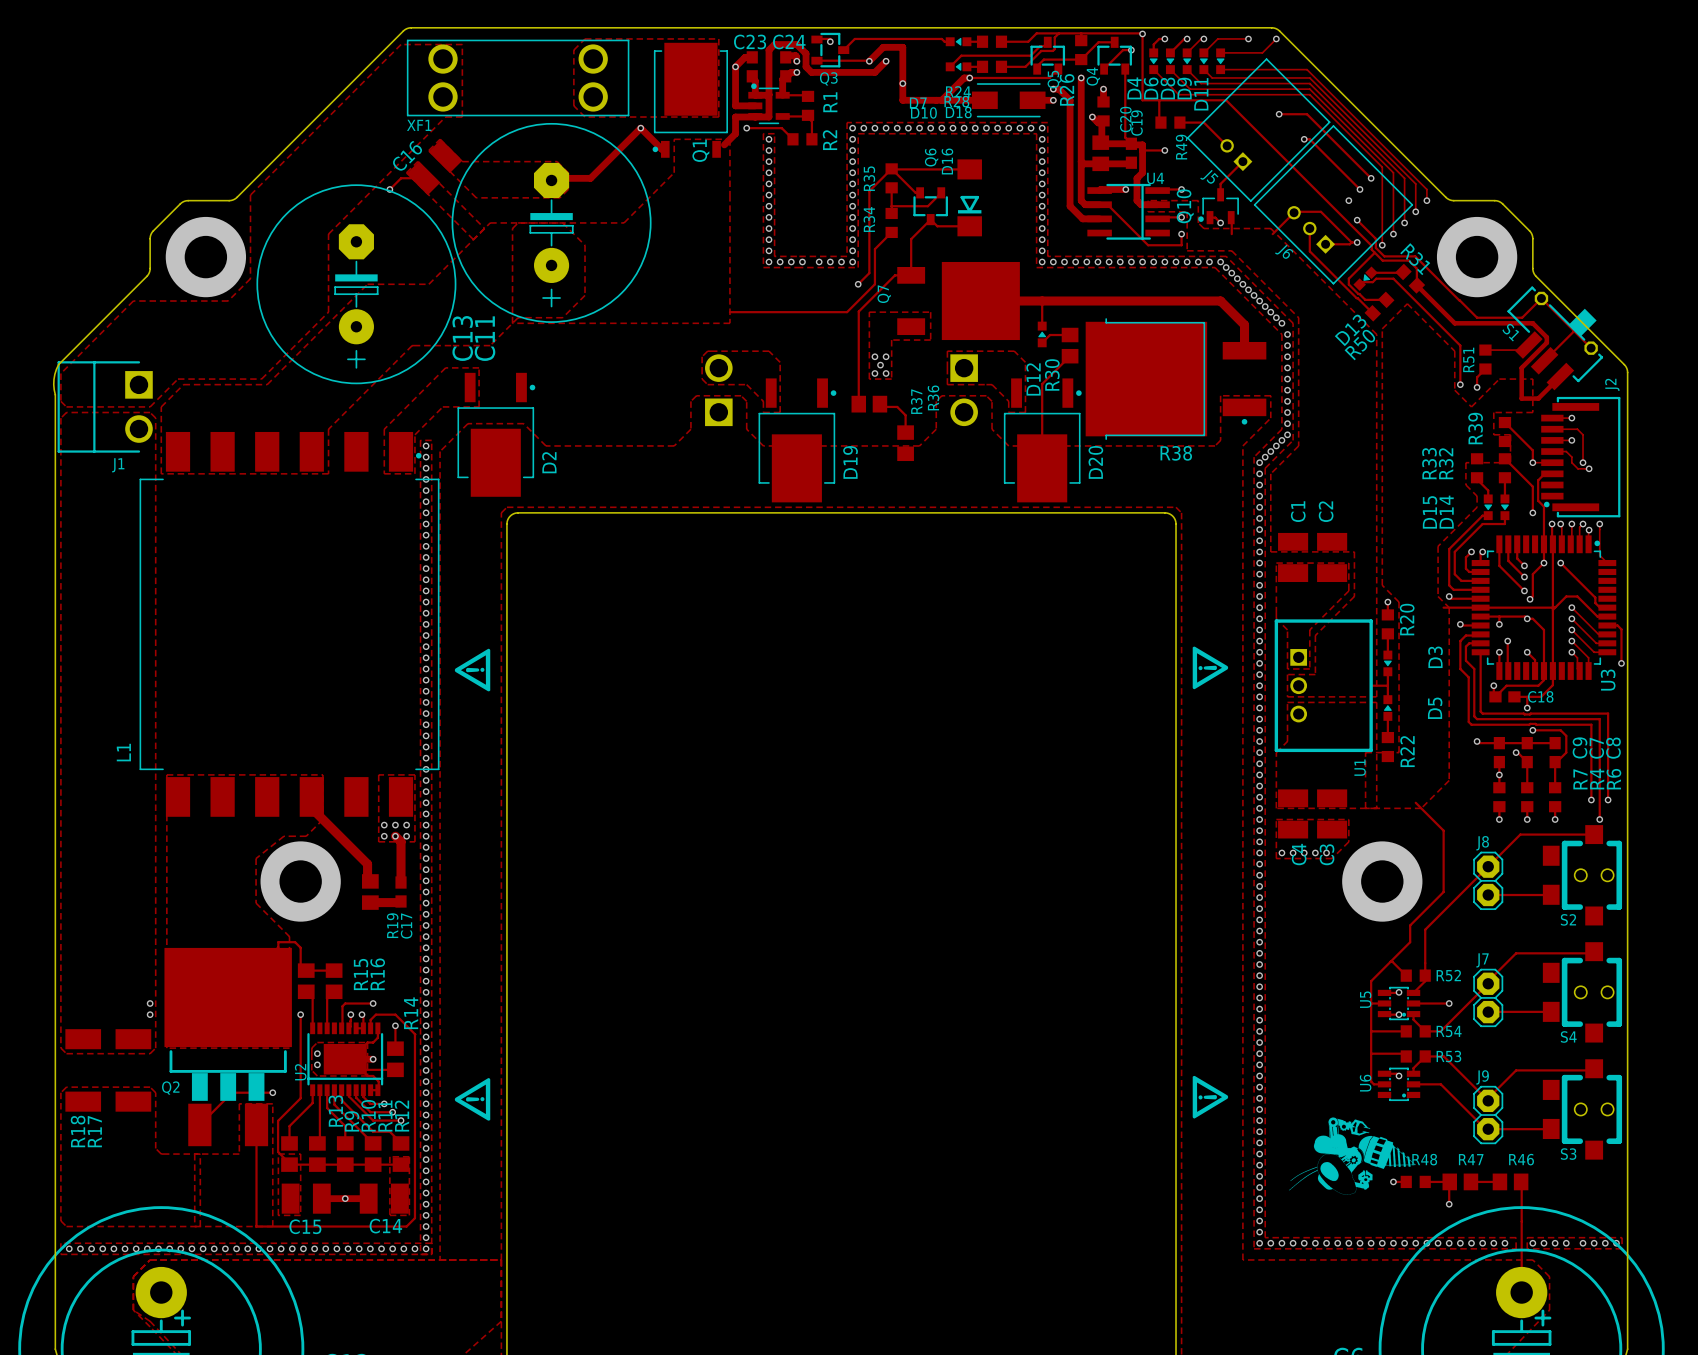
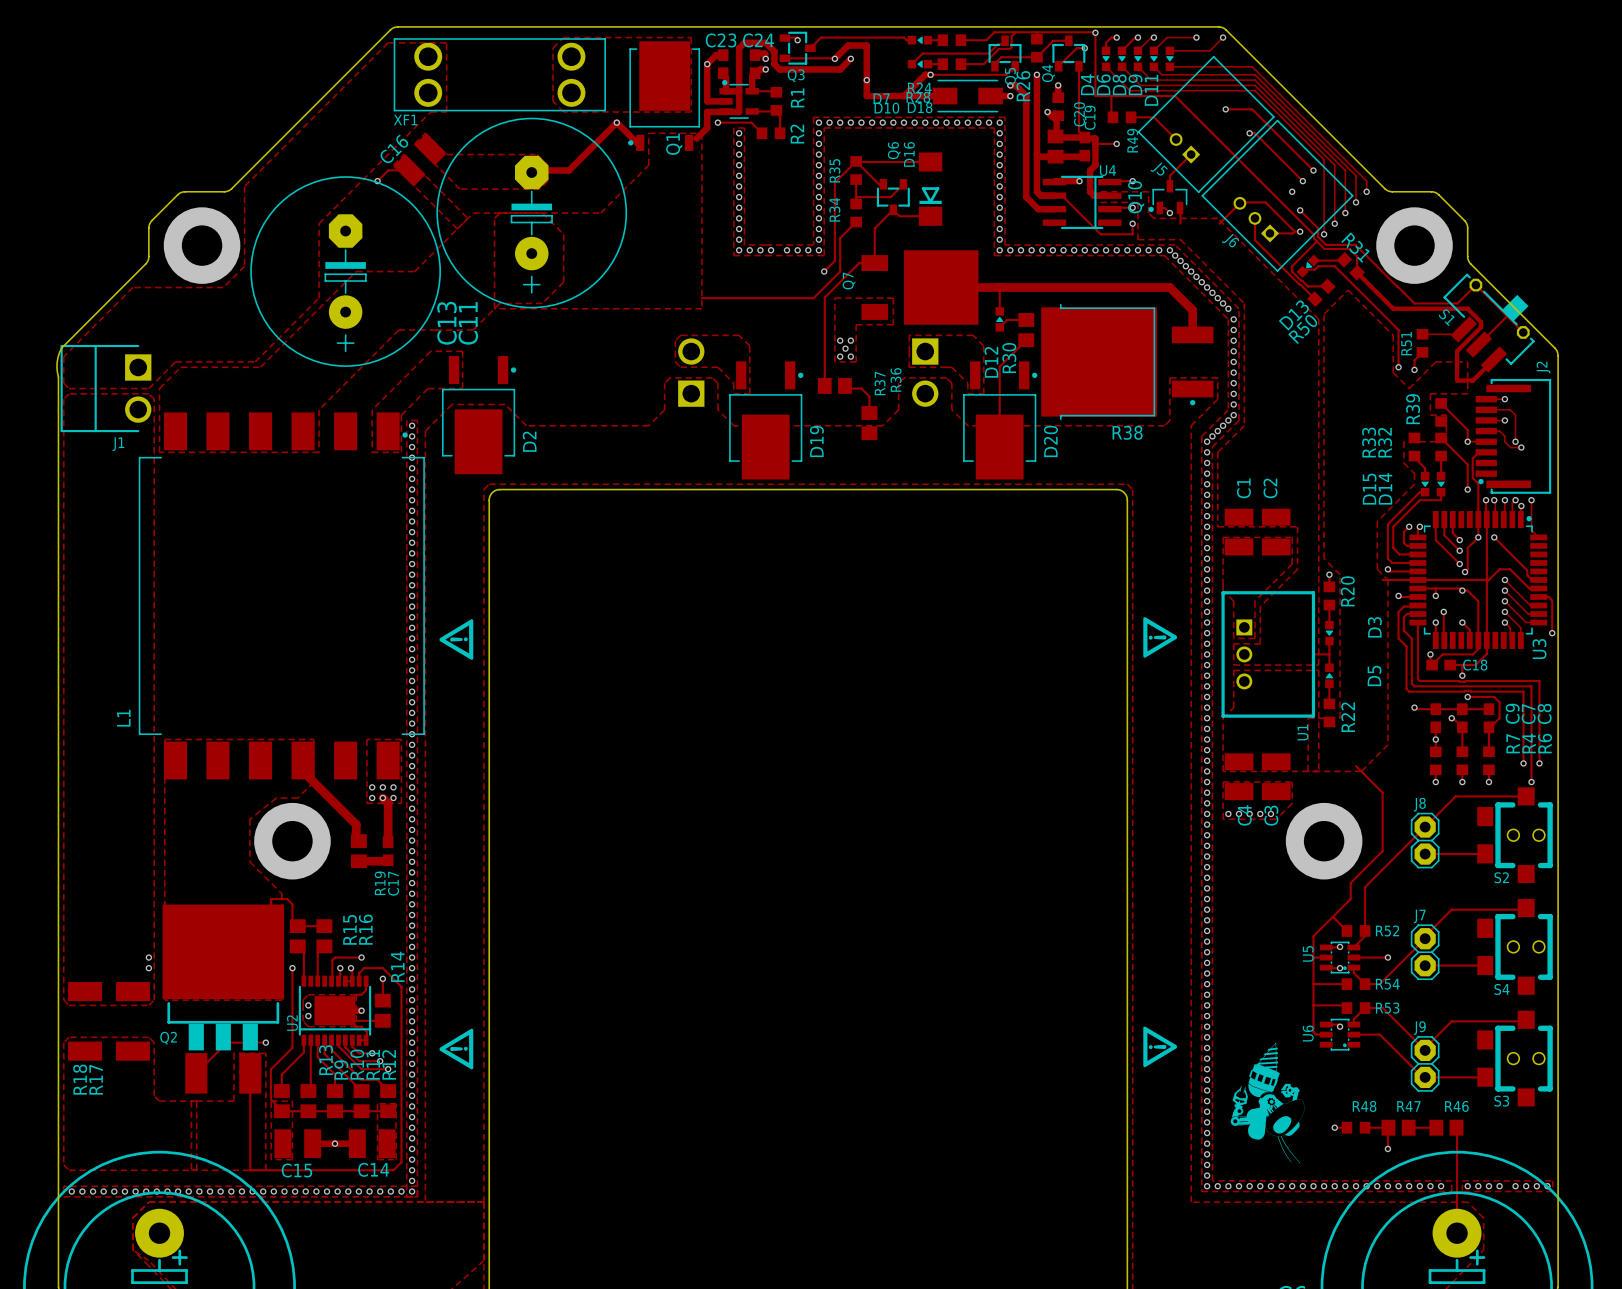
drawing: none -> [1230, 1042, 1305, 1164]
drawing: [1288, 1117, 1416, 1195] -> none

